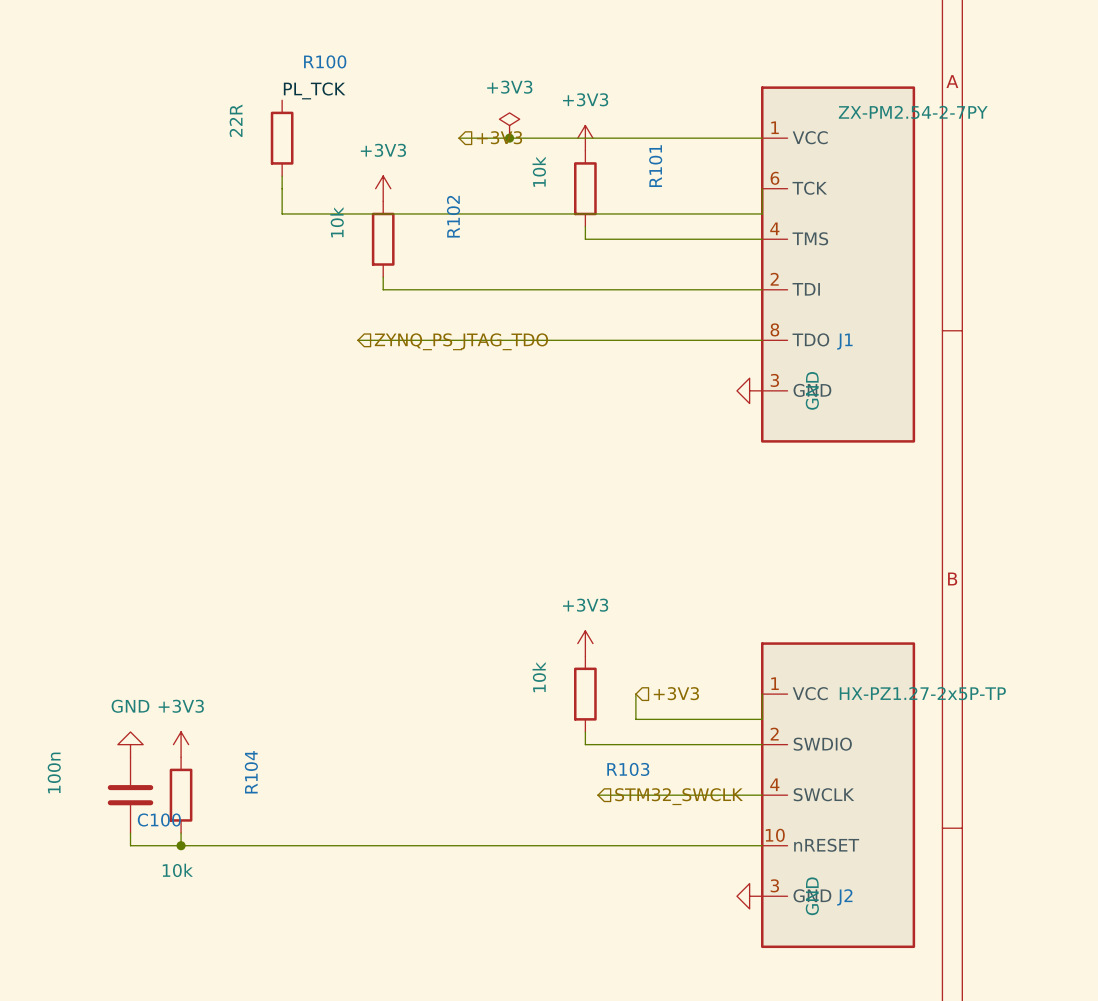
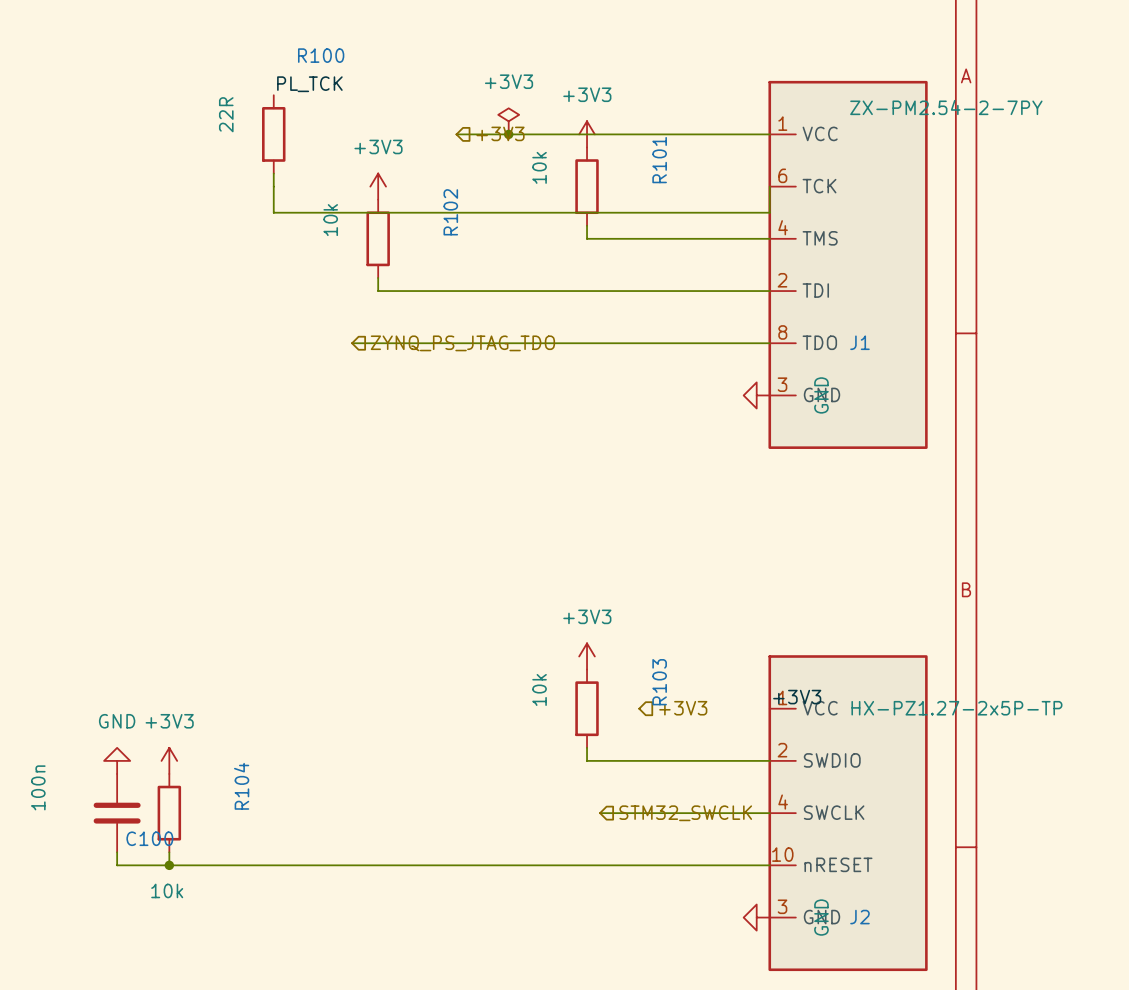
label: none -> +3V3 (797, 697)
wire: (635, 694) (635, 719) (762, 719) (762, 694) -> none
R103 name rotation: 0° (628, 769) -> 90° counterclockwise (659, 682)
R103 name position: R103 (628, 769) -> R103 (659, 682)

